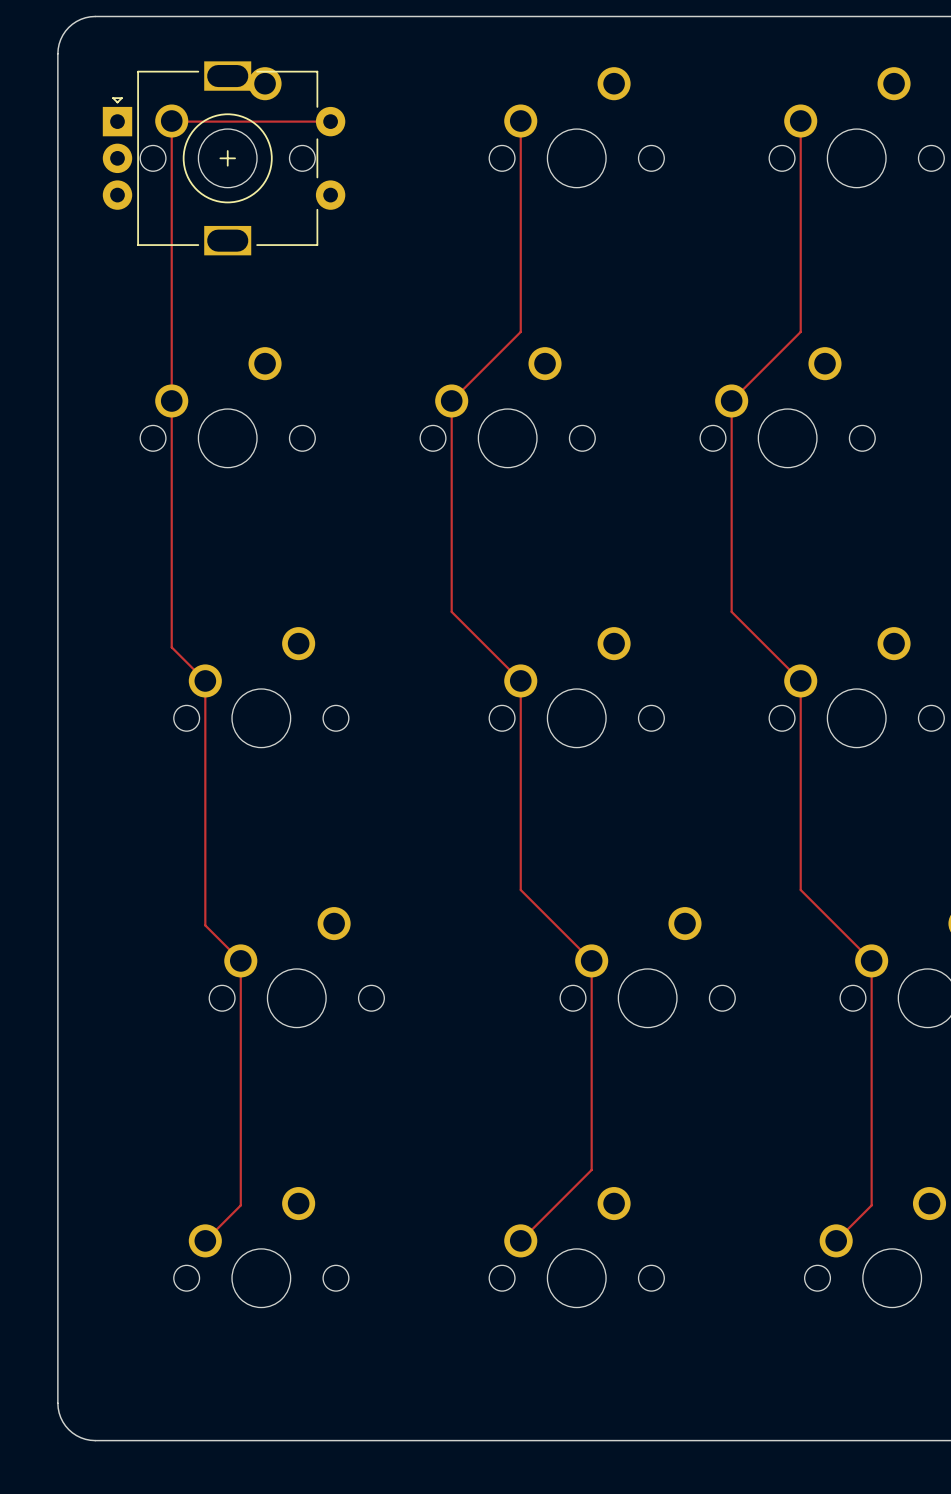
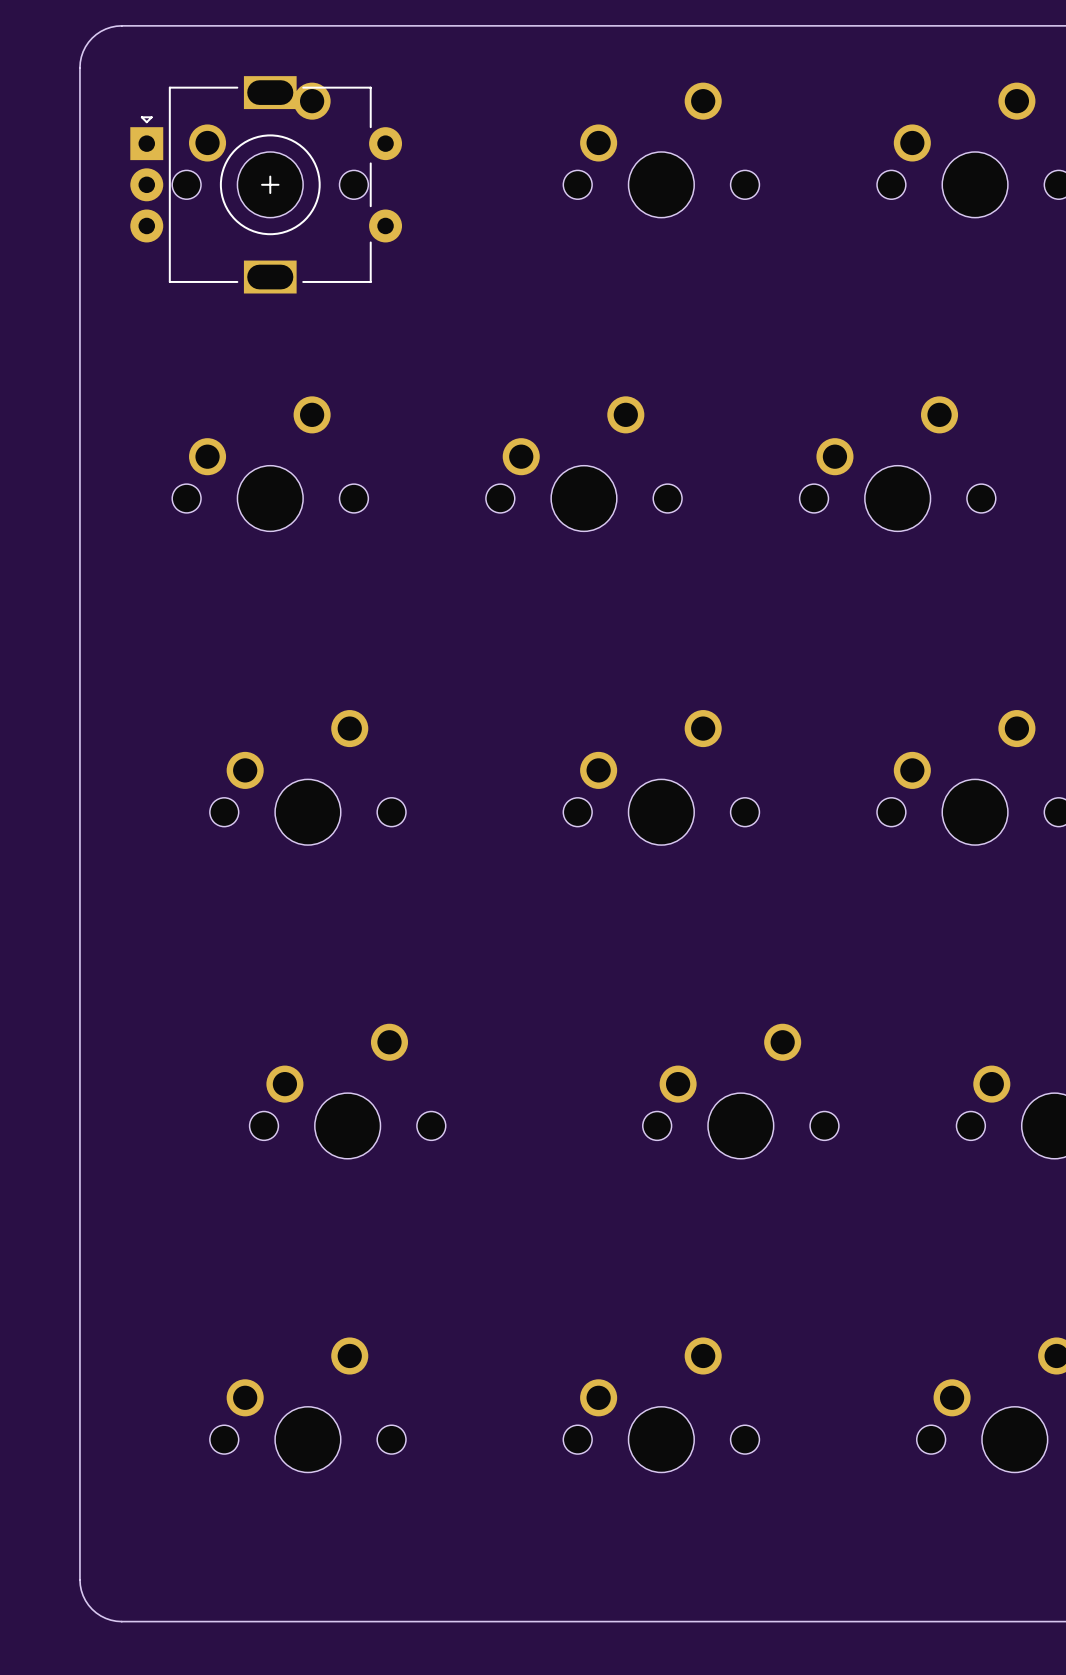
track: (330, 121) (171, 121) (171, 647) (205, 680) (205, 925) (240, 960) (240, 1205) (205, 1240) -> none
track: (520, 121) (520, 331) (451, 400) (451, 611) (520, 680) (520, 889) (591, 960) (591, 1169) (520, 1240) -> none
track: (800, 121) (800, 331) (731, 400) (731, 611) (800, 680) (800, 889) (871, 960) (871, 1205) (836, 1240) -> none

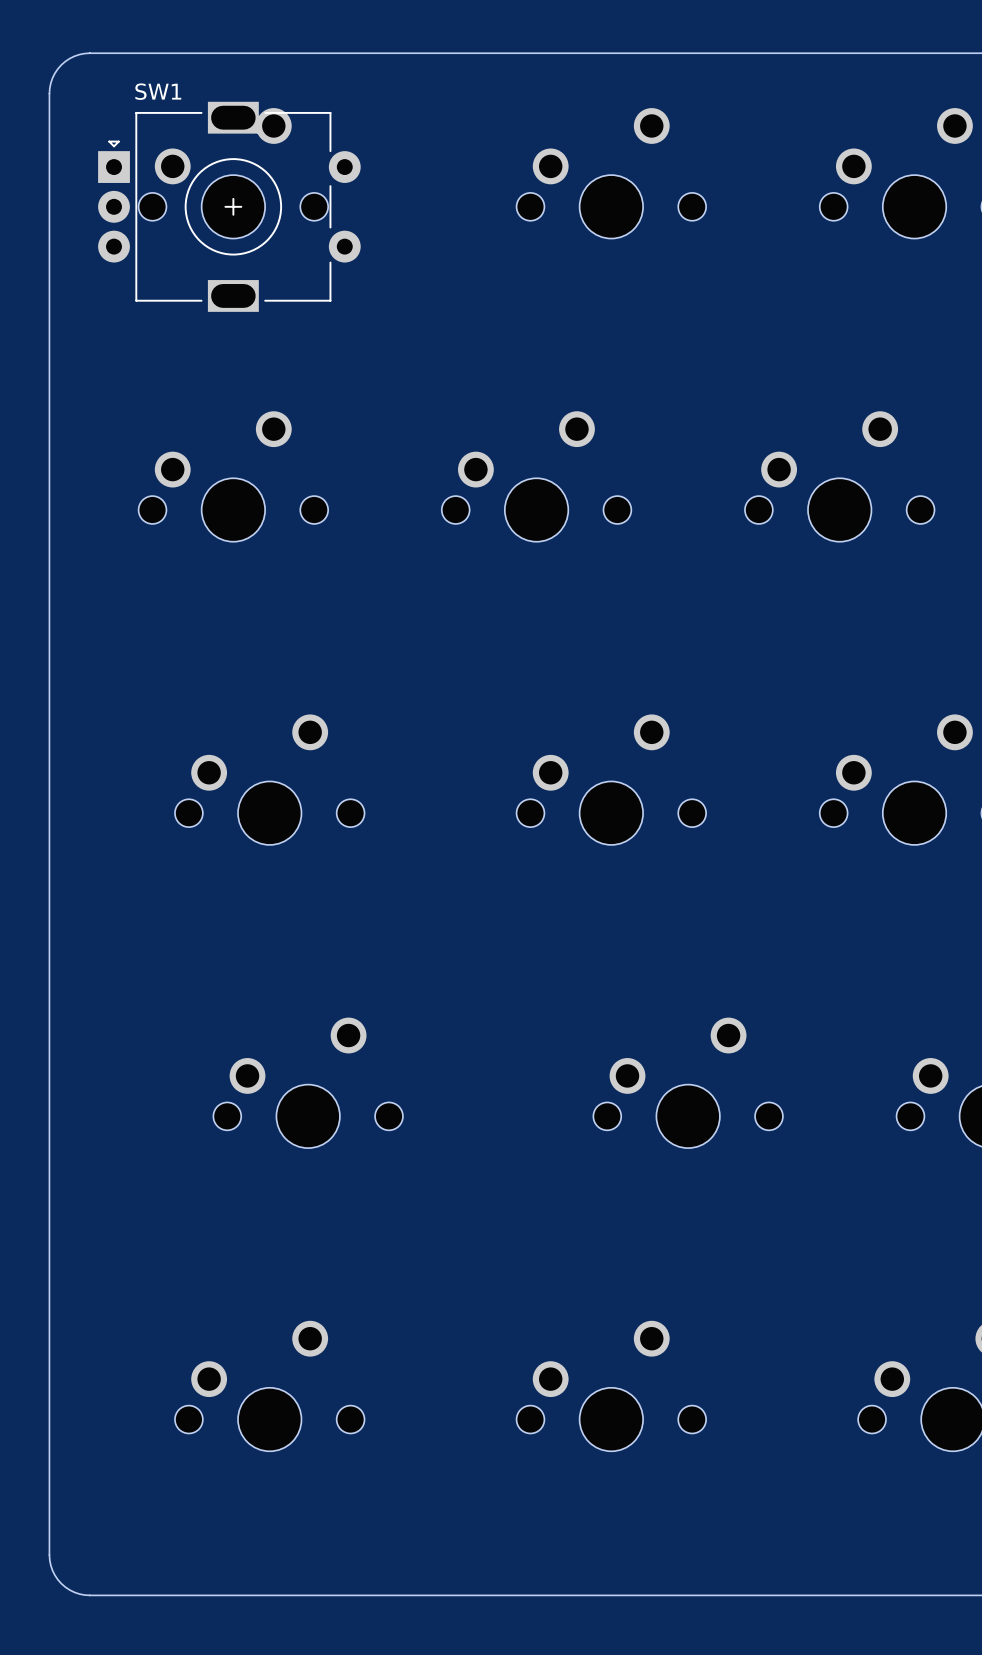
SW1 name: none -> SW1 (158, 91)

